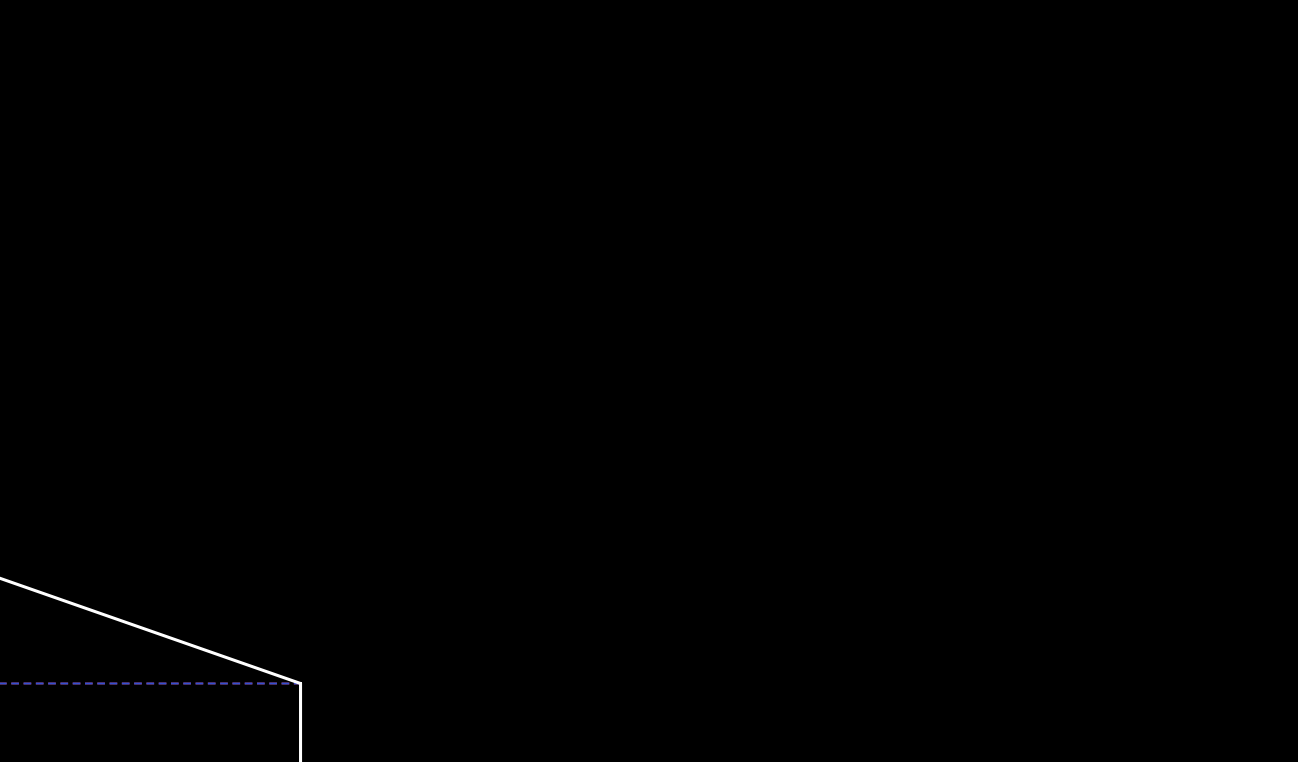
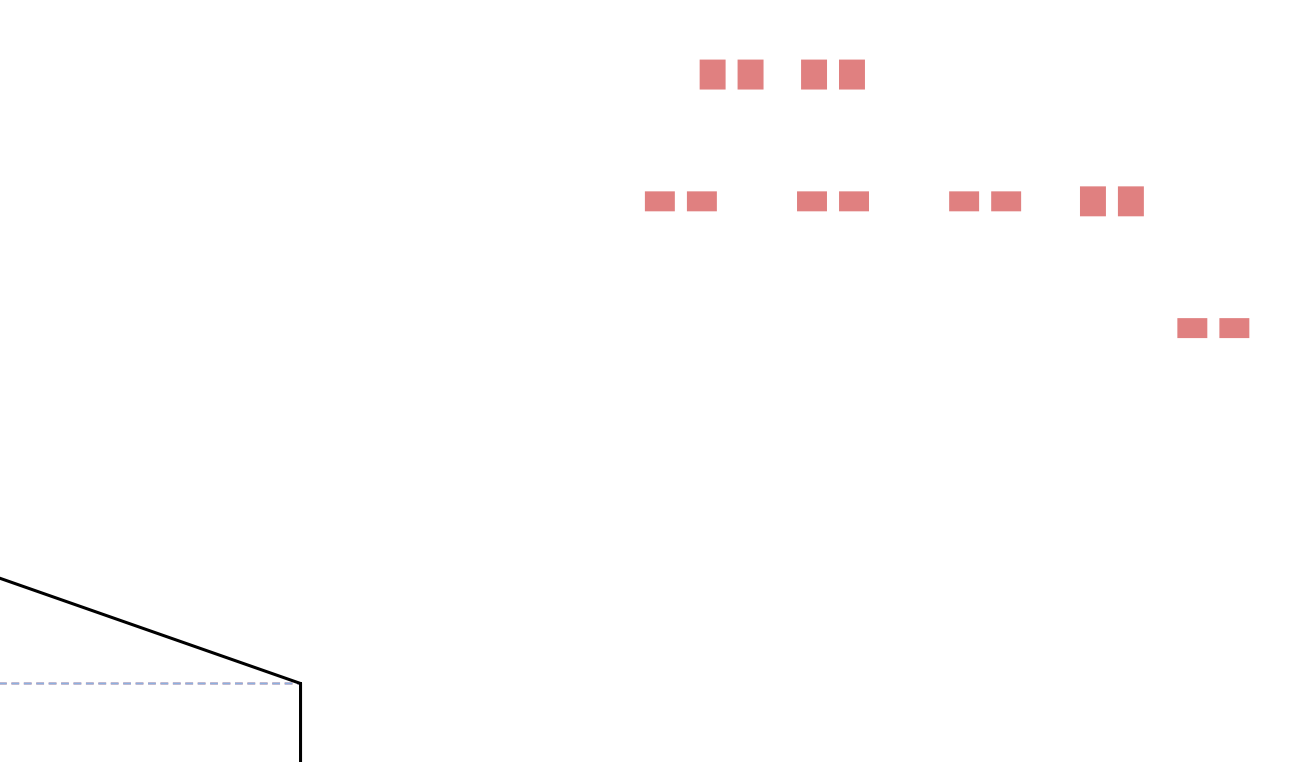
part: none -> (731, 74)
part: none -> (833, 74)
part: none -> (680, 201)
part: none -> (833, 201)
part: none -> (985, 201)
part: none -> (1111, 201)
part: none -> (1213, 328)

